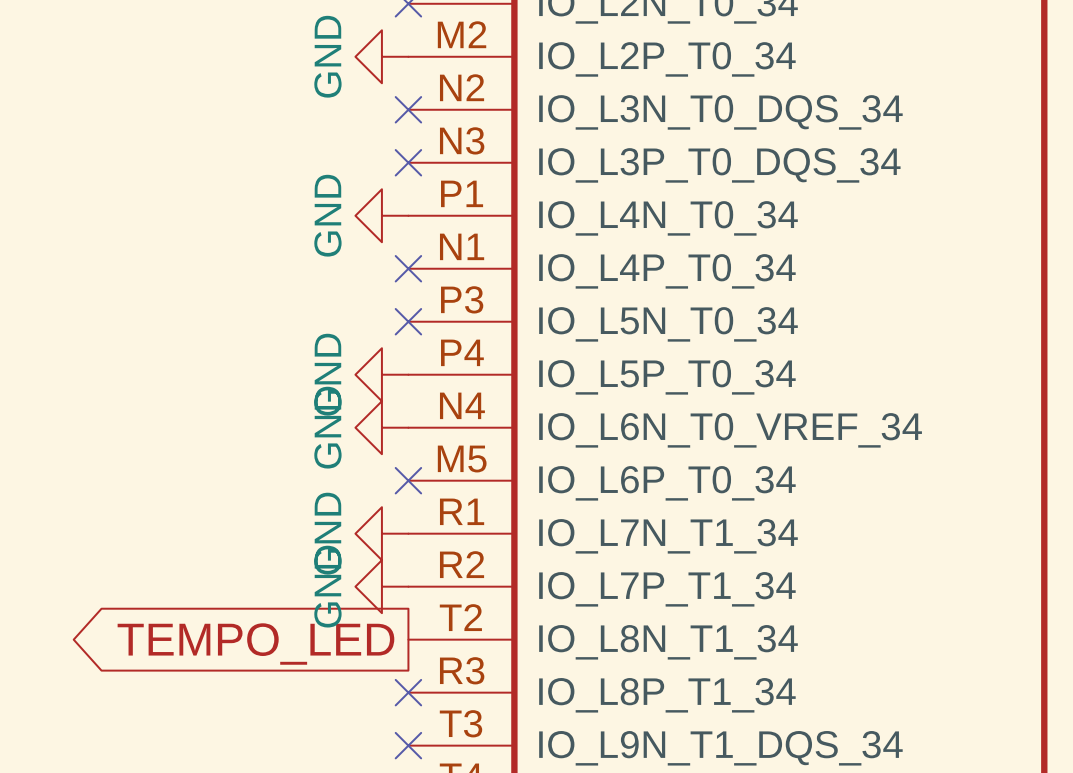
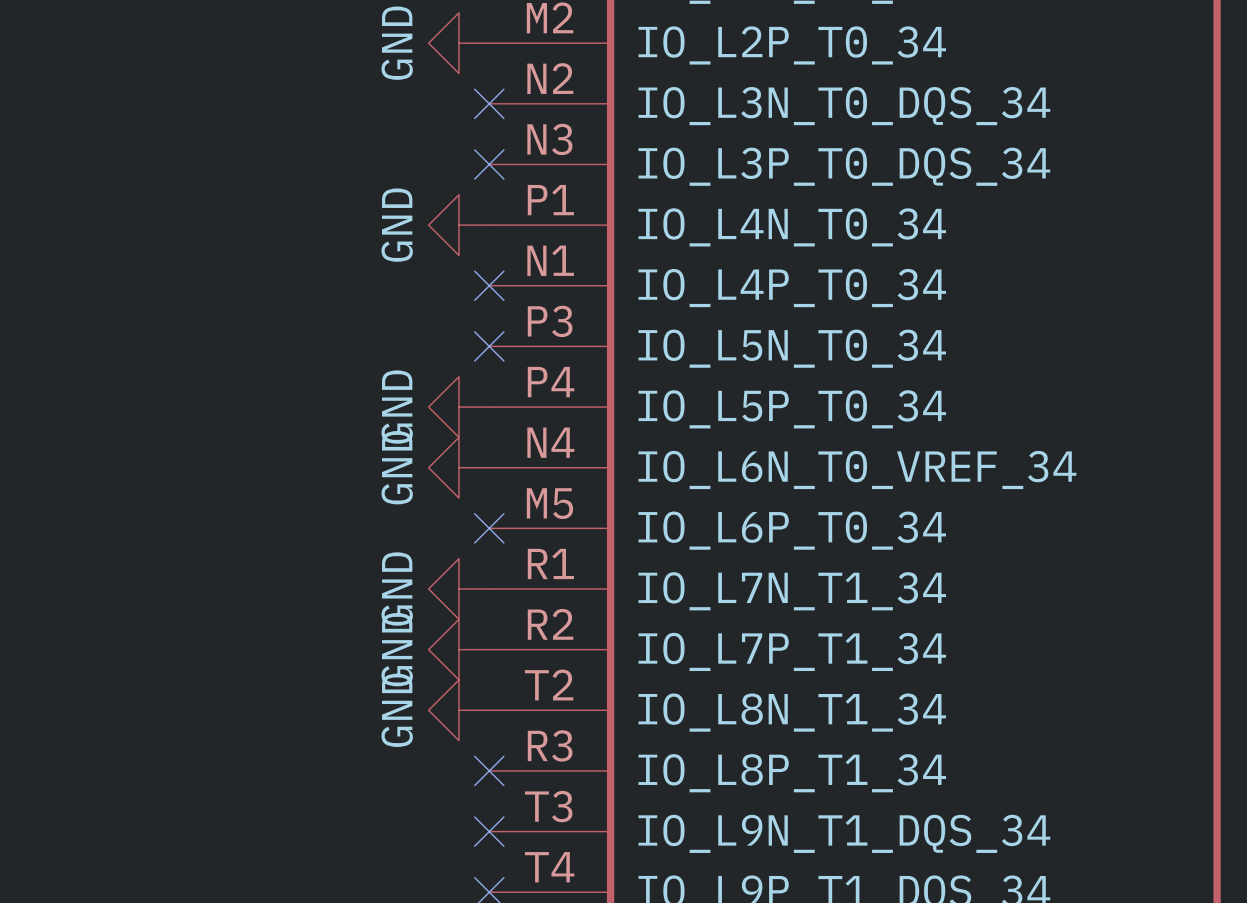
power symbol: none -> GND (458, 710)
global label: TEMPO_LED (255, 644) -> none

